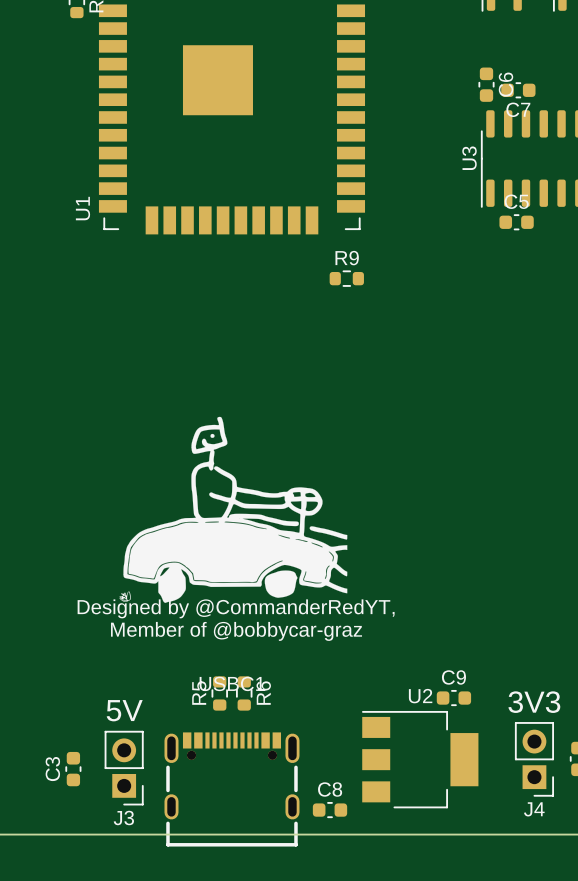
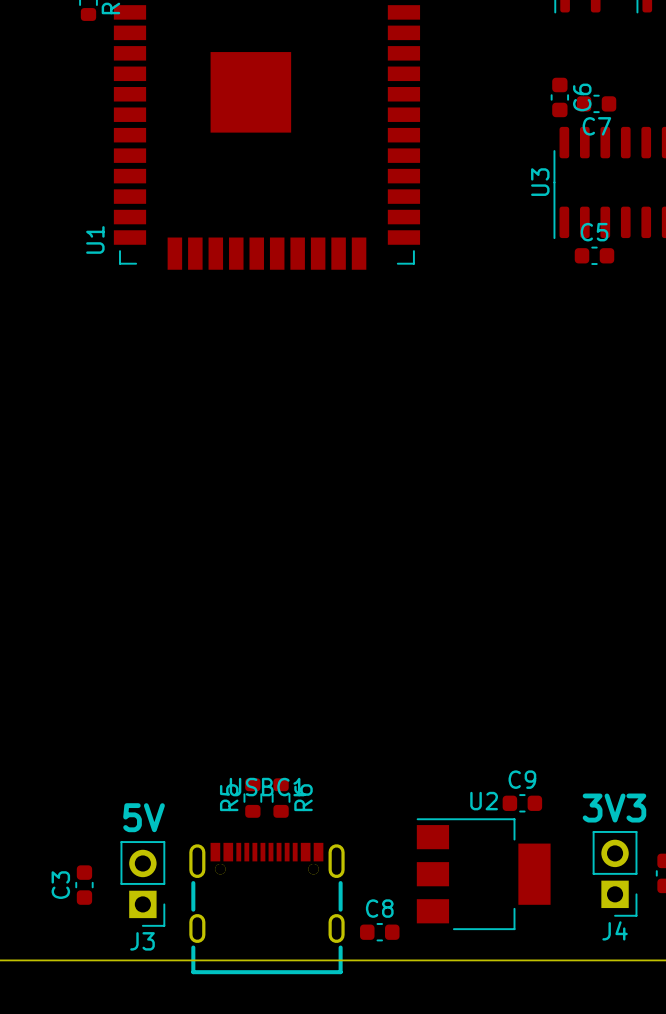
R9: (346, 278) -> none
drawing: [119, 416, 348, 603] -> none
text: Designed by @CommanderRedYT, (236, 608) -> none
text: Member of @bobbycar-graz (236, 631) -> none

